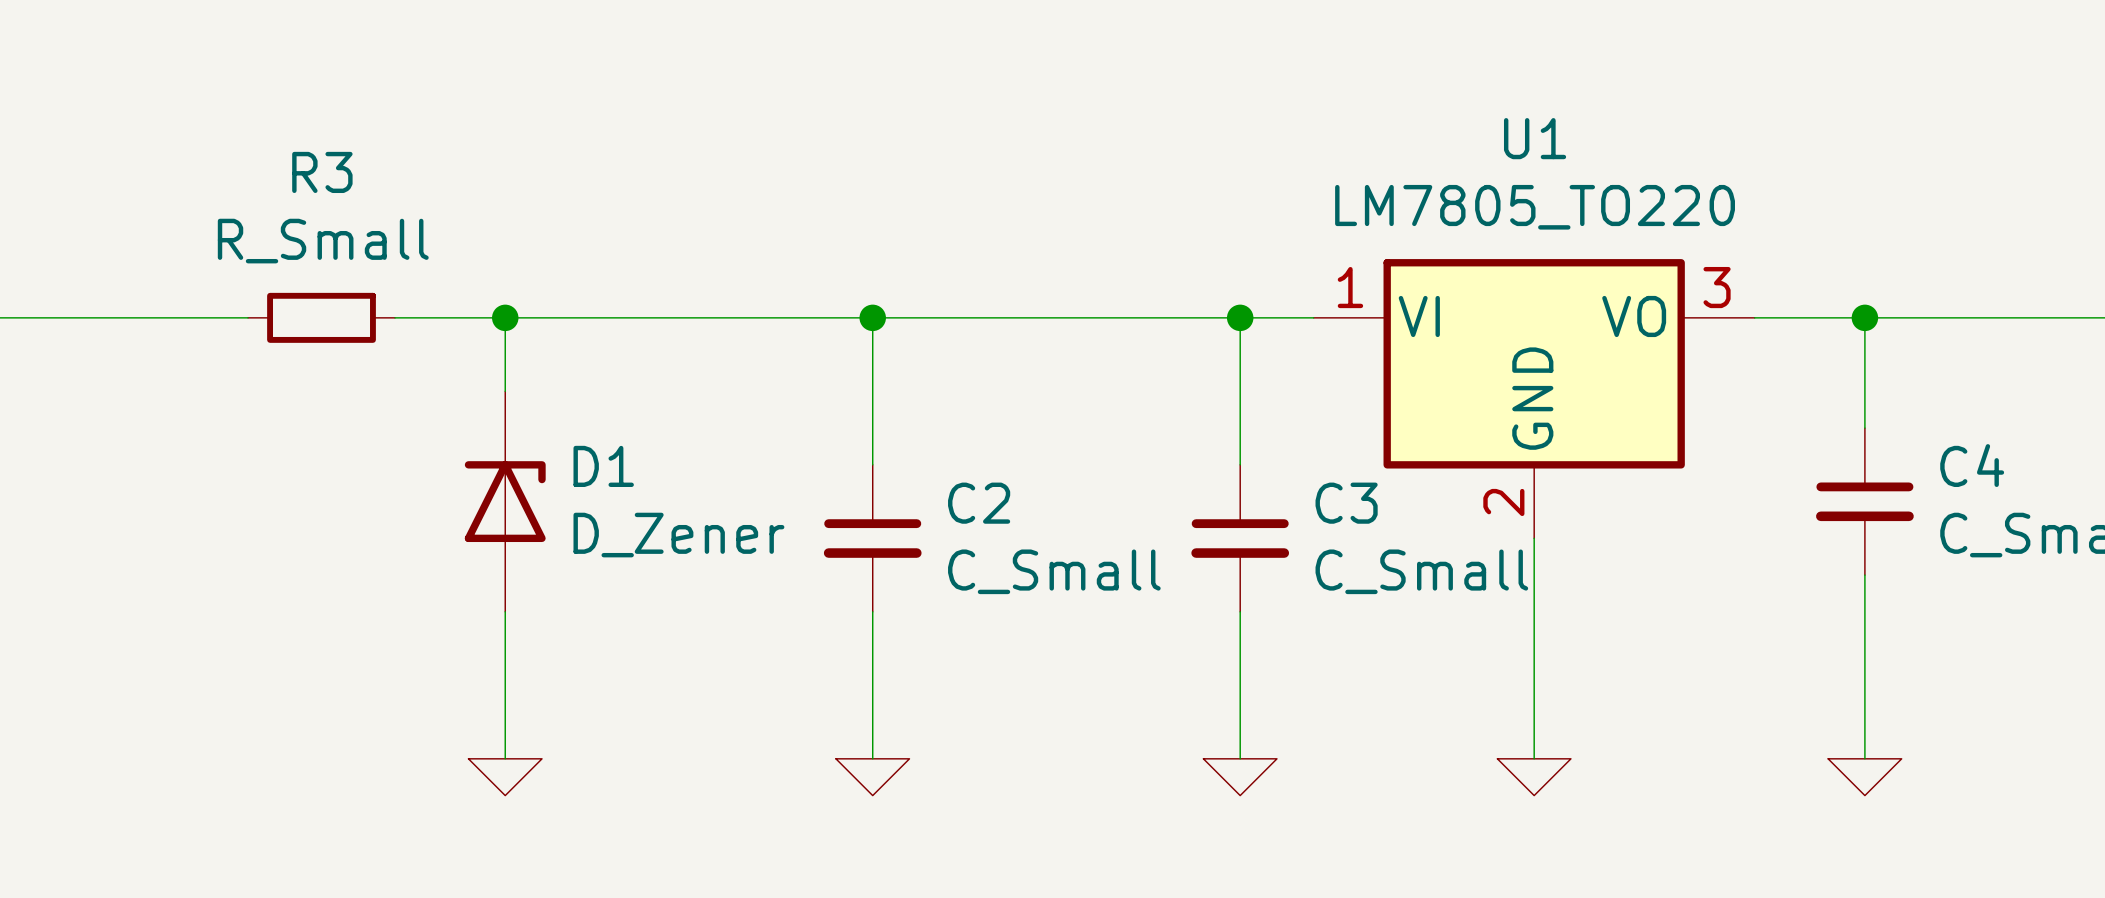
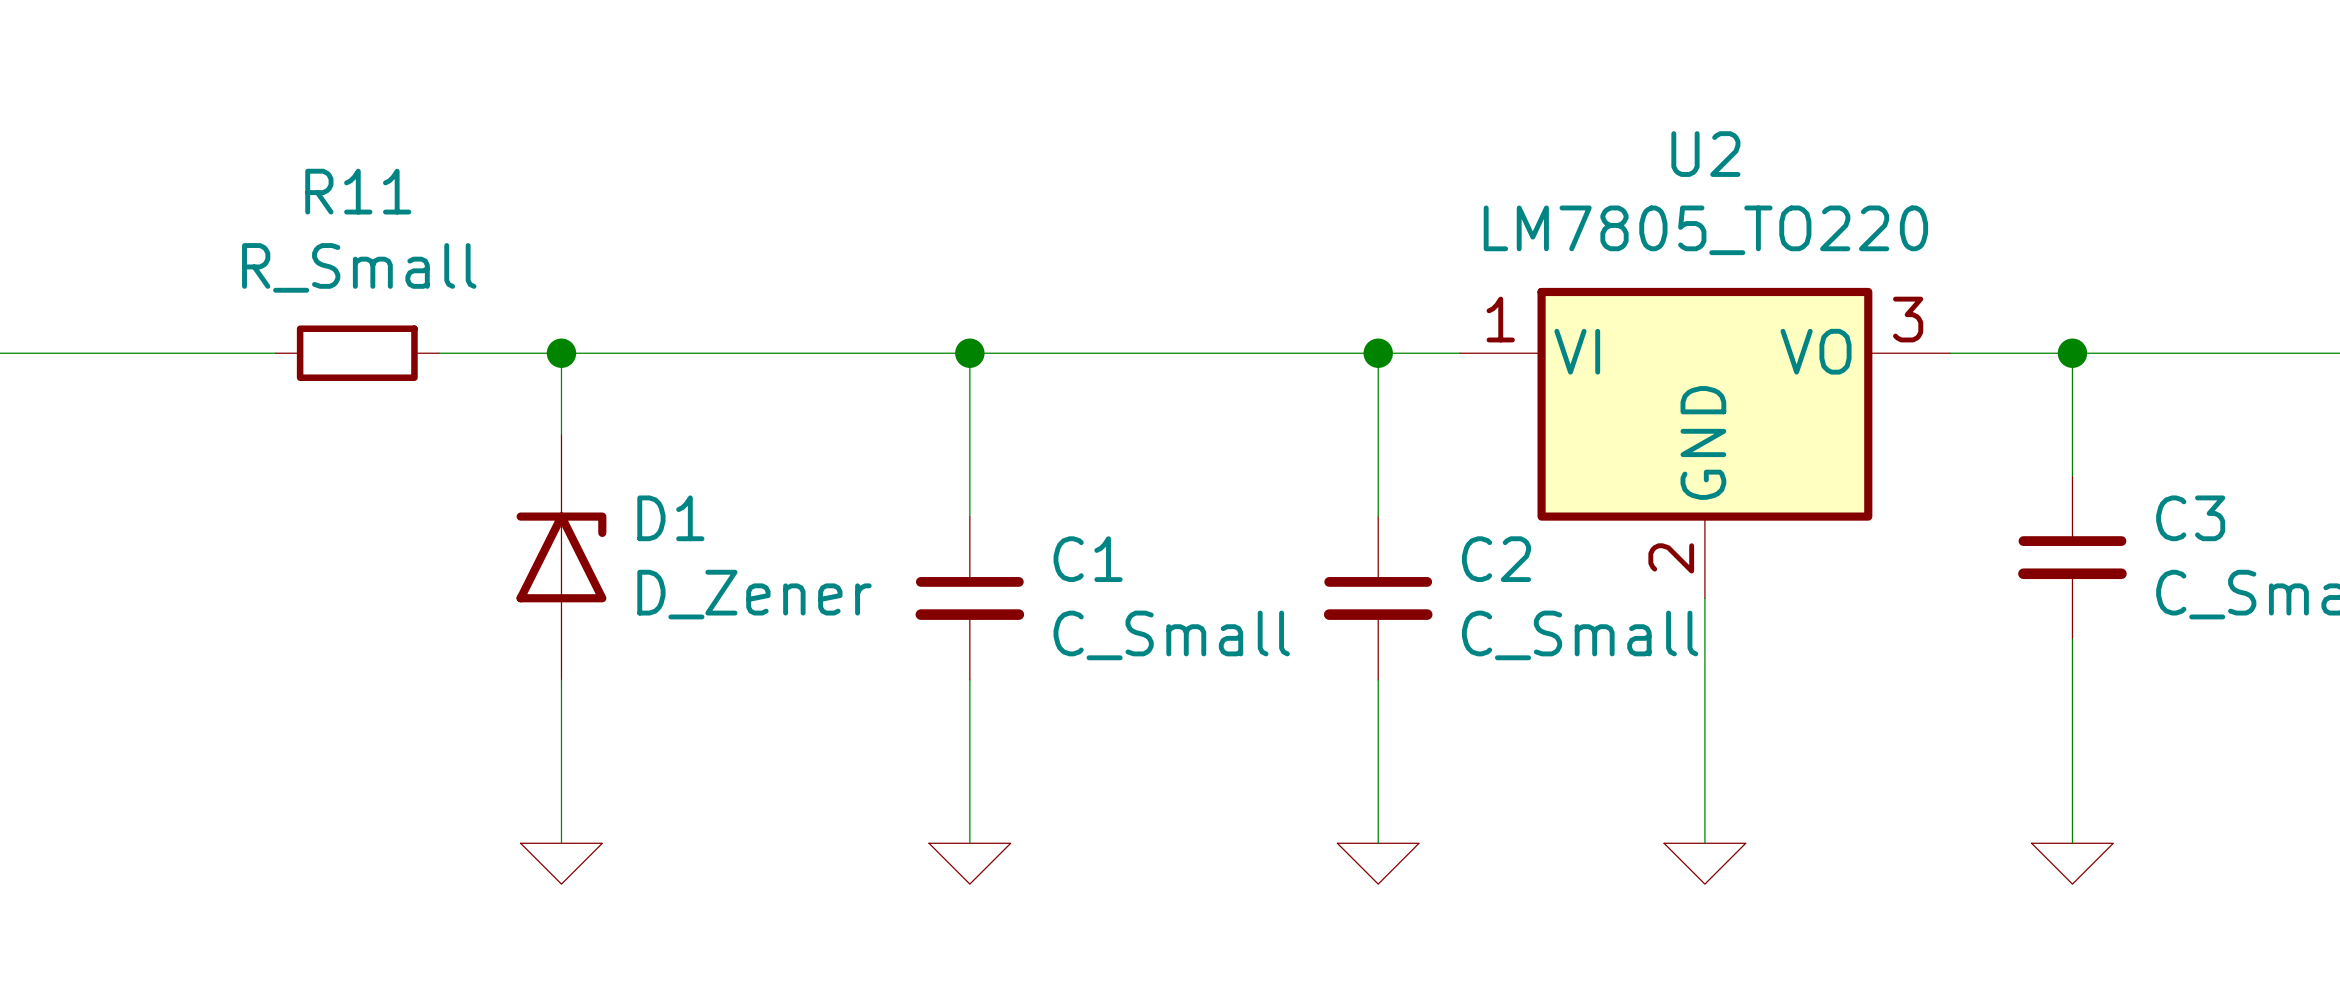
U1 name: U1 (1535, 138) -> U2 (1705, 154)
R3 name: R3 (322, 172) -> R11 (358, 191)
C4 name: C4 (1972, 465) -> C3 (2190, 518)
C2 name: C2 (979, 503) -> C1 (1088, 559)
C3 name: C3 (1346, 503) -> C2 (1496, 559)

